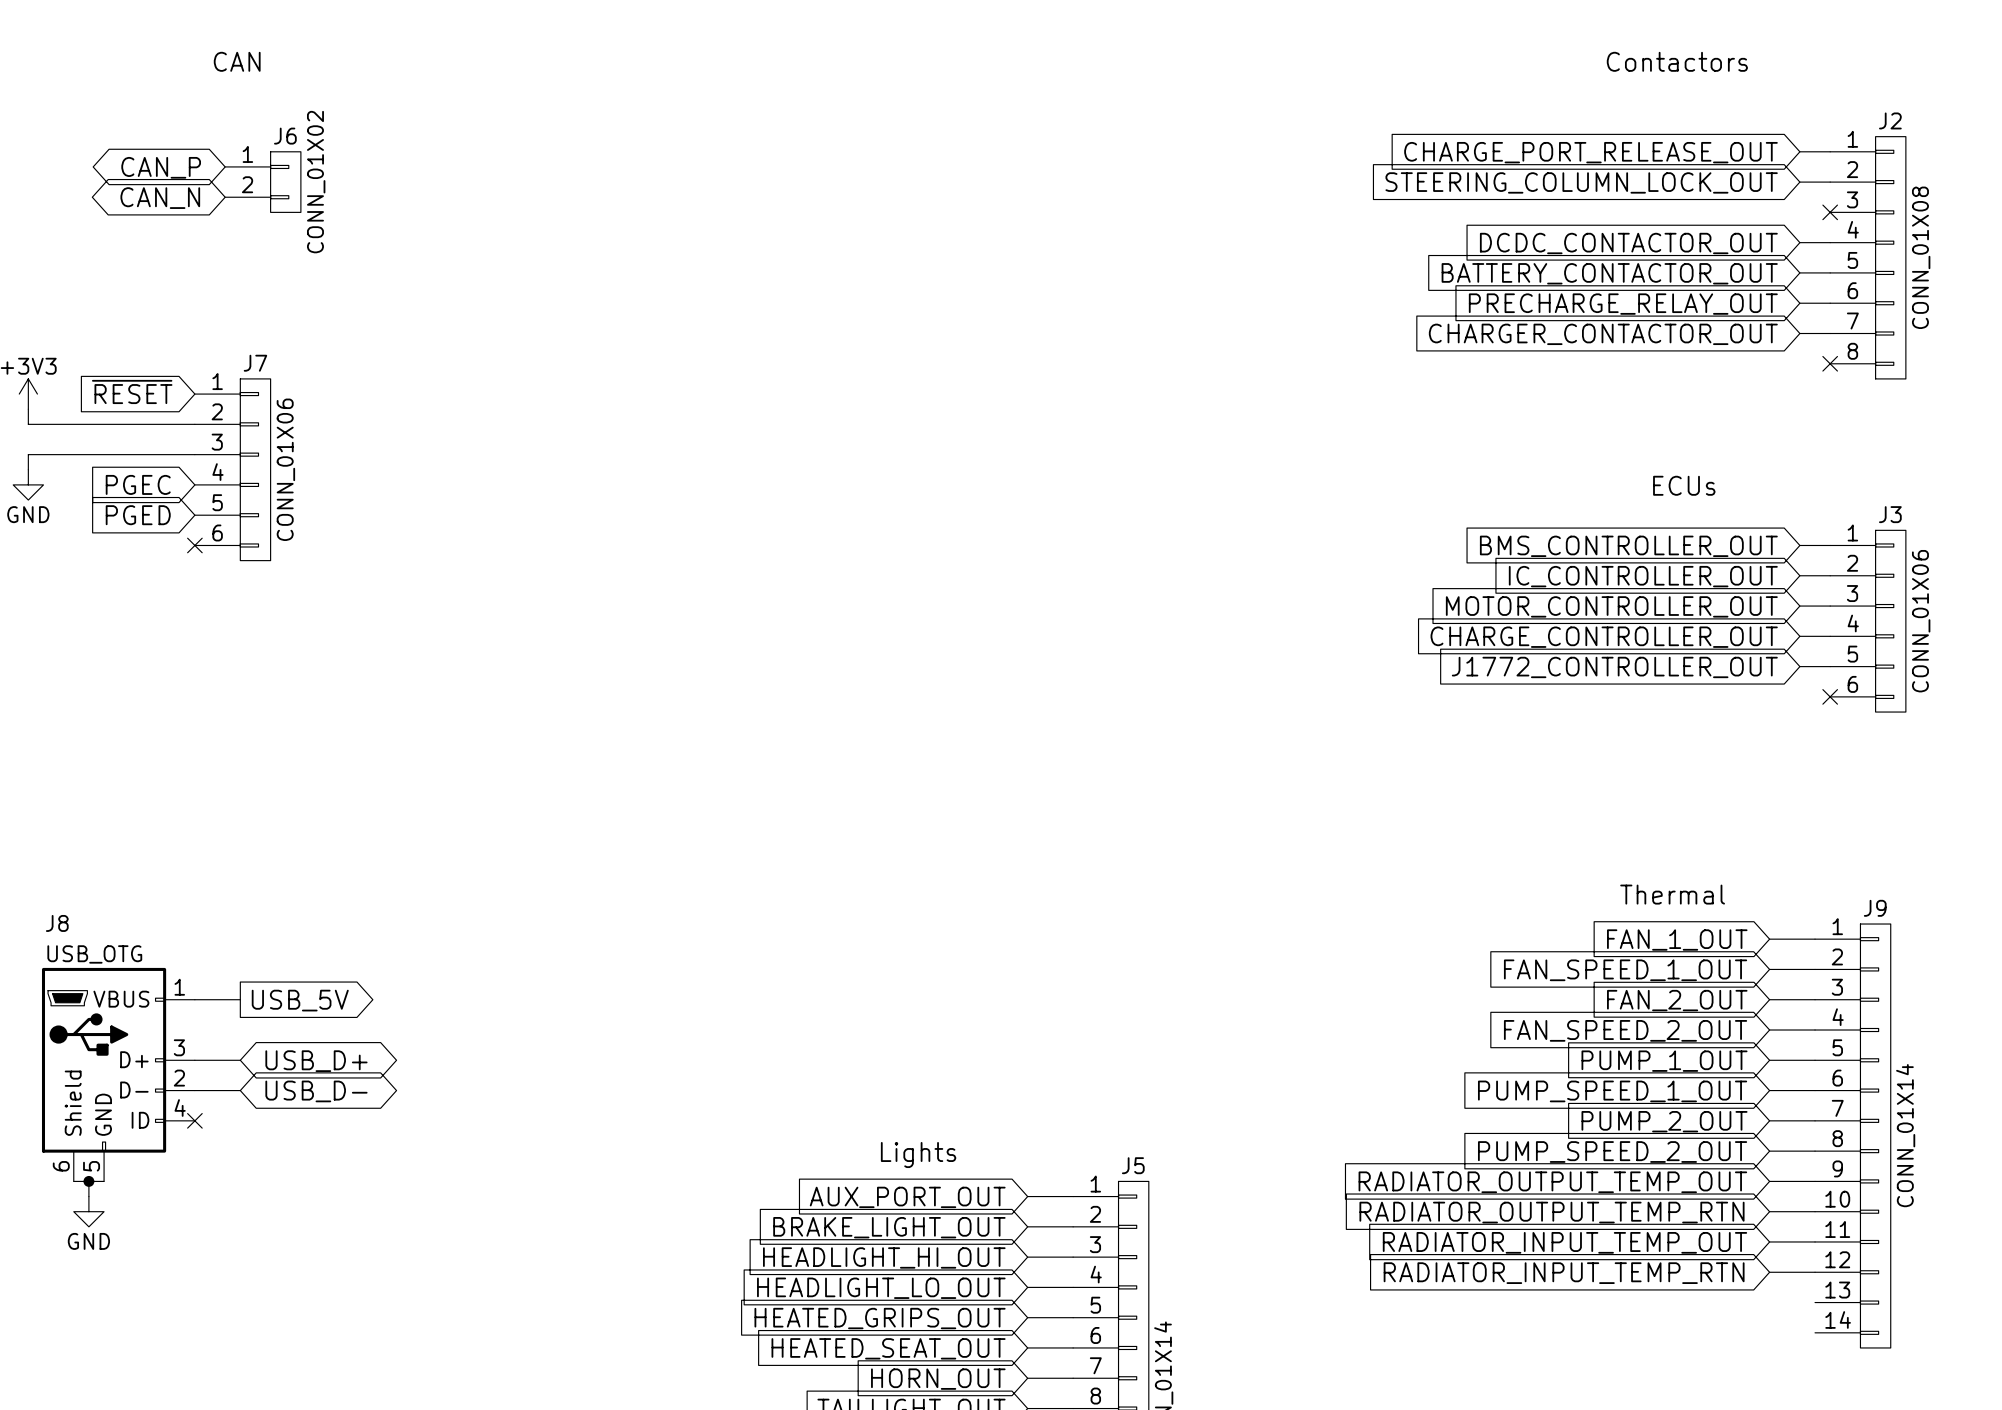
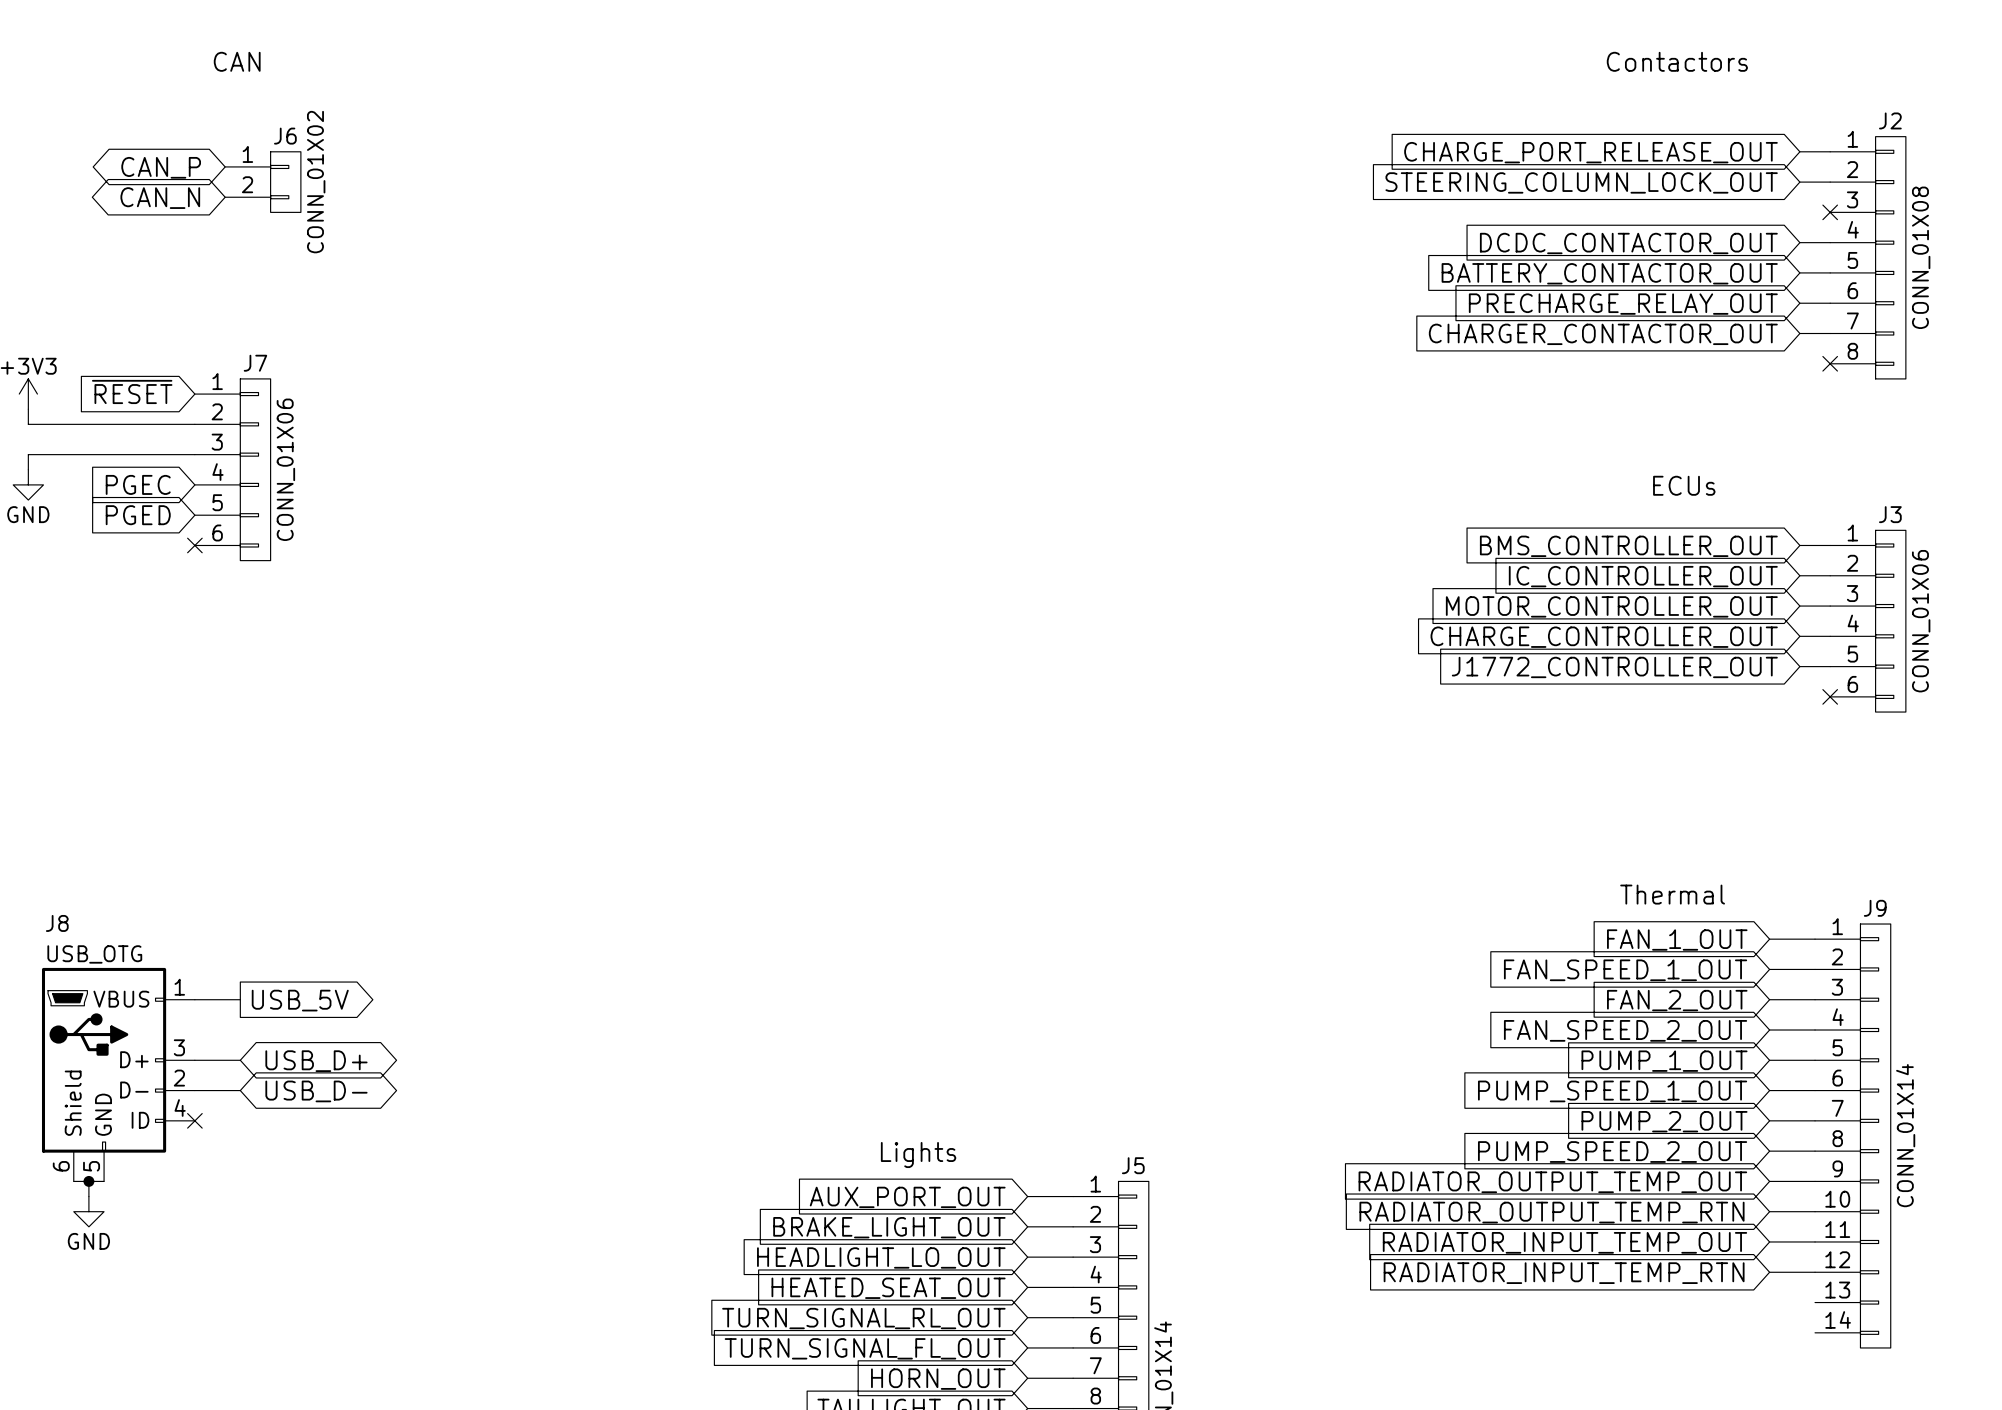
global label: HEADLIGHT_HI_OUT (884, 1257) -> HEADLIGHT_LO_OUT (881, 1257)
global label: HEADLIGHT_LO_OUT (881, 1288) -> HEATED_SEAT_OUT (888, 1288)
global label: HEATED_GRIPS_OUT (880, 1318) -> TURN_SIGNAL_RL_OUT (863, 1318)
global label: HEATED_SEAT_OUT (888, 1348) -> TURN_SIGNAL_FL_OUT (865, 1348)

